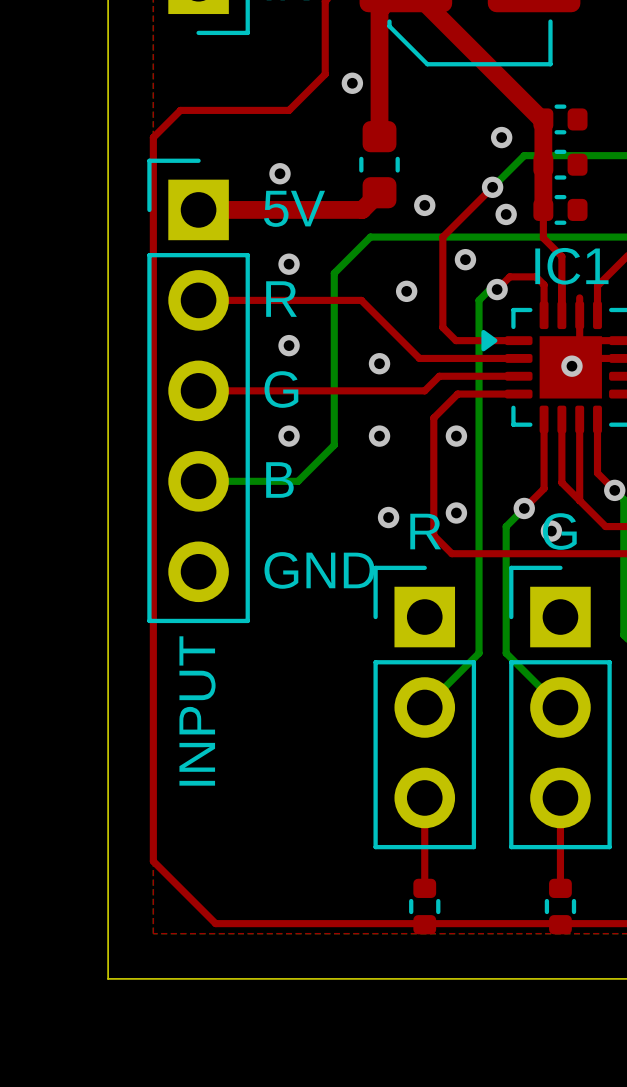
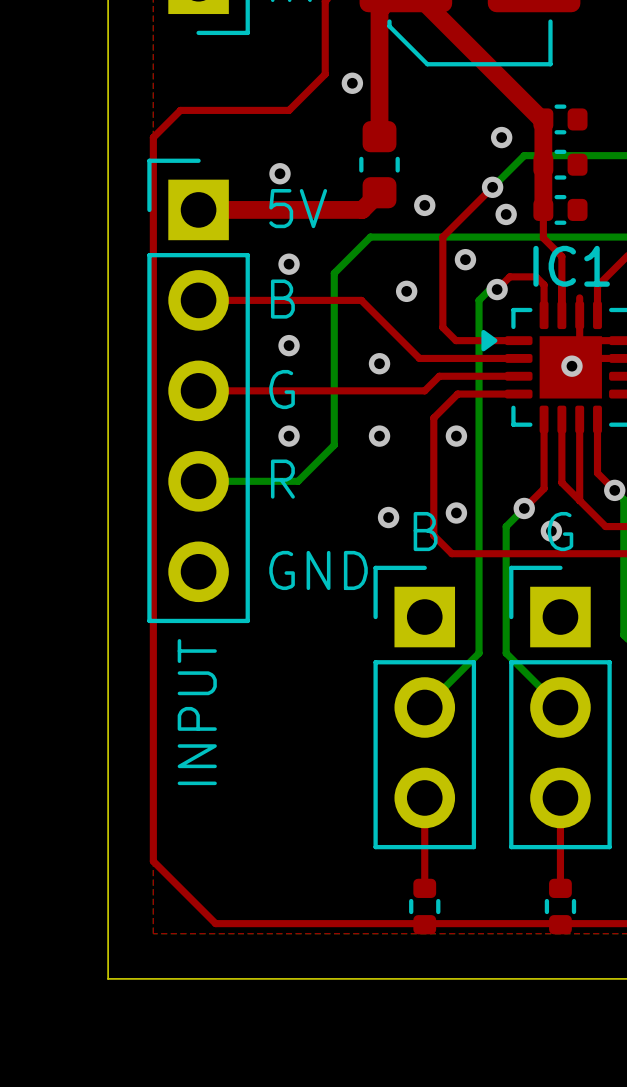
text: R (281, 299) -> B (282, 299)
text: B (279, 479) -> R (282, 479)
text: R (425, 531) -> B (425, 531)

